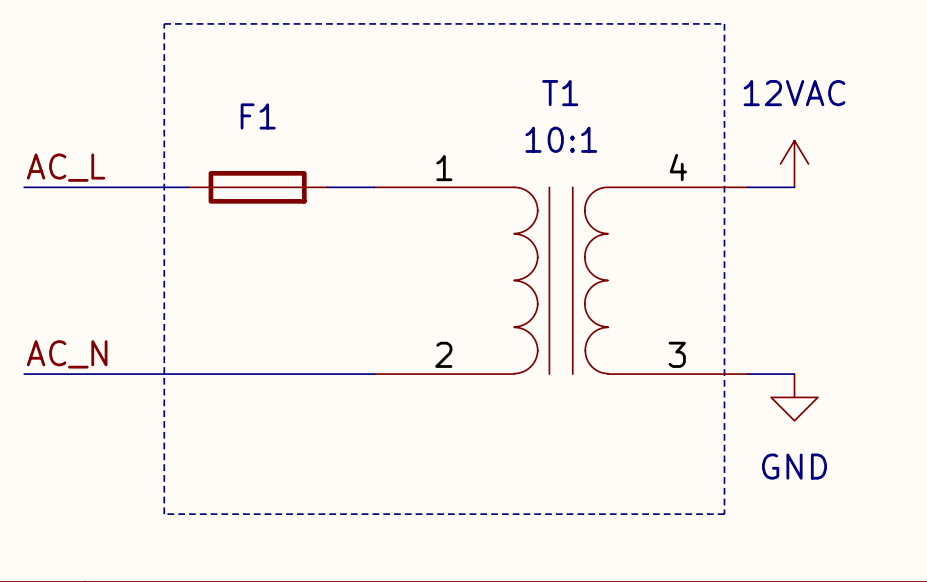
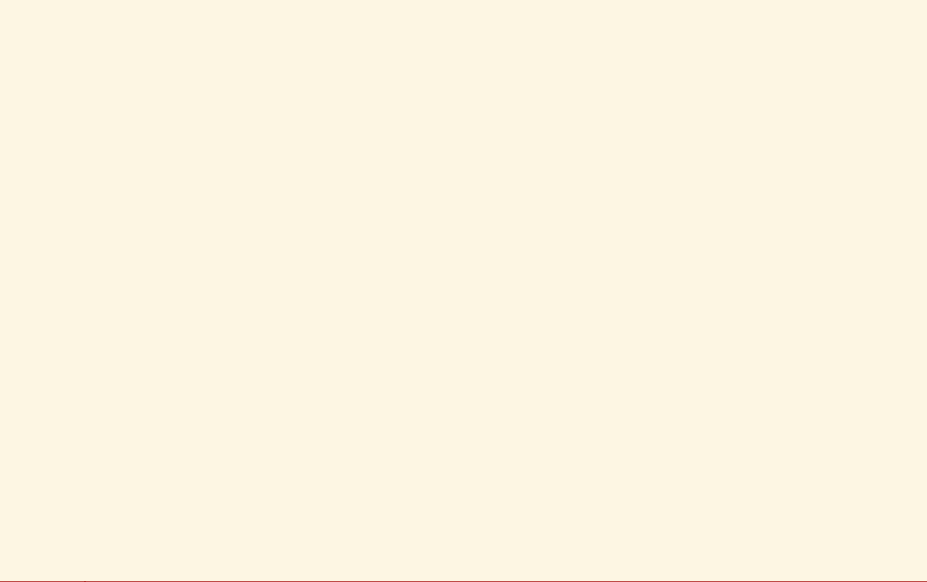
line: (164, 23) (724, 23) (724, 514) (164, 514) (164, 23) -> none
power symbol: 12VAC (794, 164) -> none
label: AC_L (66, 167) -> none
wire: (24, 187) (187, 187) -> none
F1: (257, 187) -> none
wire: (327, 187) (374, 187) -> none
wire: (747, 187) (794, 187) -> none
T1: 10:1 (561, 280) -> none
label: AC_N (67, 354) -> none
wire: (24, 374) (374, 374) -> none
wire: (747, 374) (794, 374) -> none
power symbol: GND (794, 397) -> none

